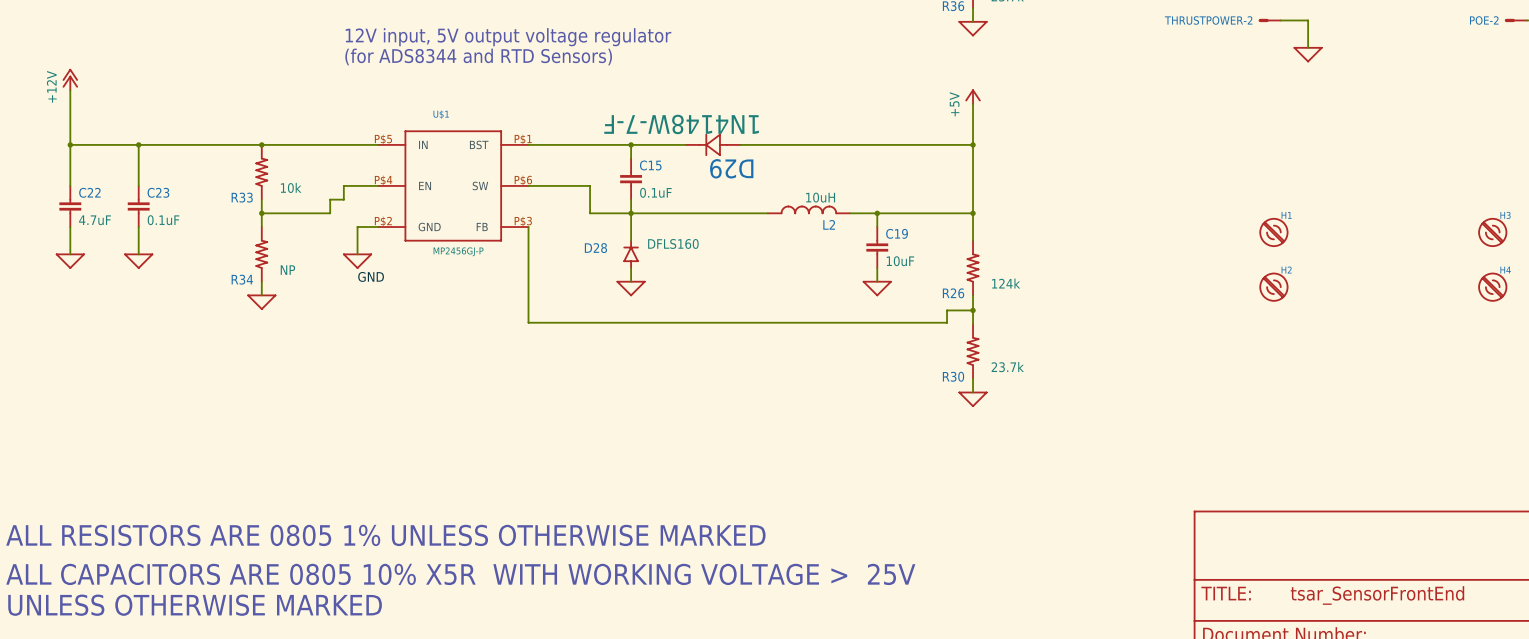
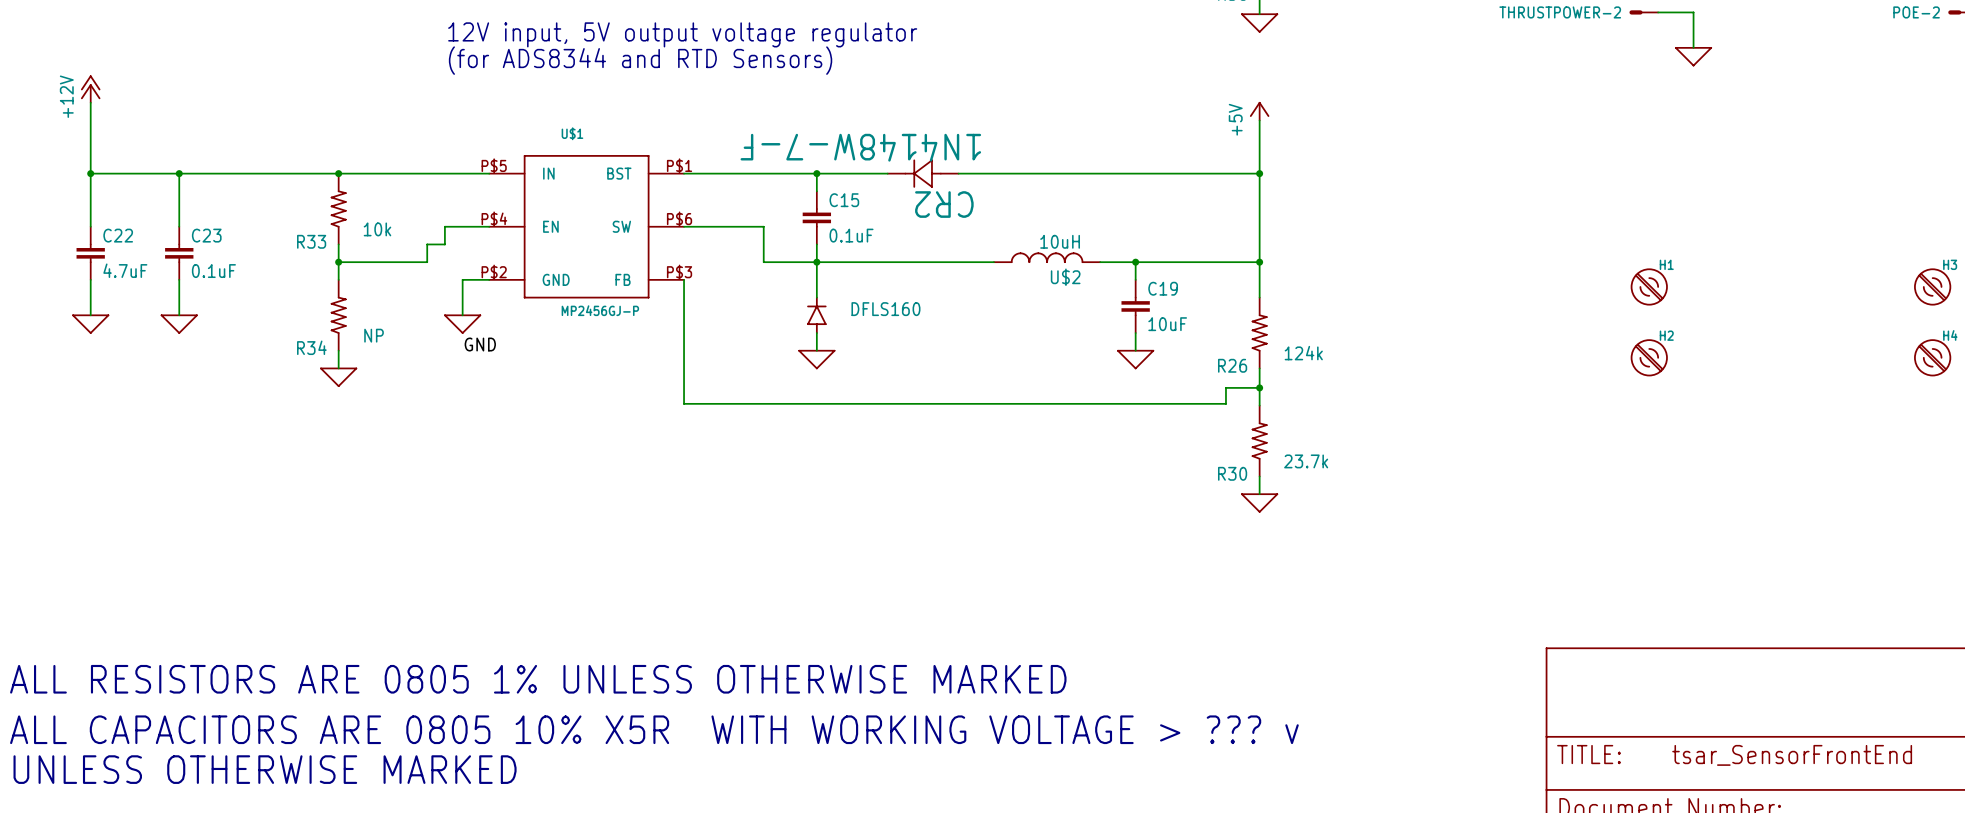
D29 name: D29 (731, 168) -> CR2 (944, 204)
L2 name: L2 (829, 224) -> U$2 (1065, 277)
D28 value: DFLS160 (673, 243) -> none
D28 name: D28 (595, 248) -> DFLS160 (885, 309)
text: ALL CAPACITORS ARE 0805 10% X5R WITH WORKING VOLTAGE > 25V (460, 574) -> ALL CAPACITORS ARE 0805 10% X5R WITH WORKING VOLTAGE > ??? v (654, 729)

